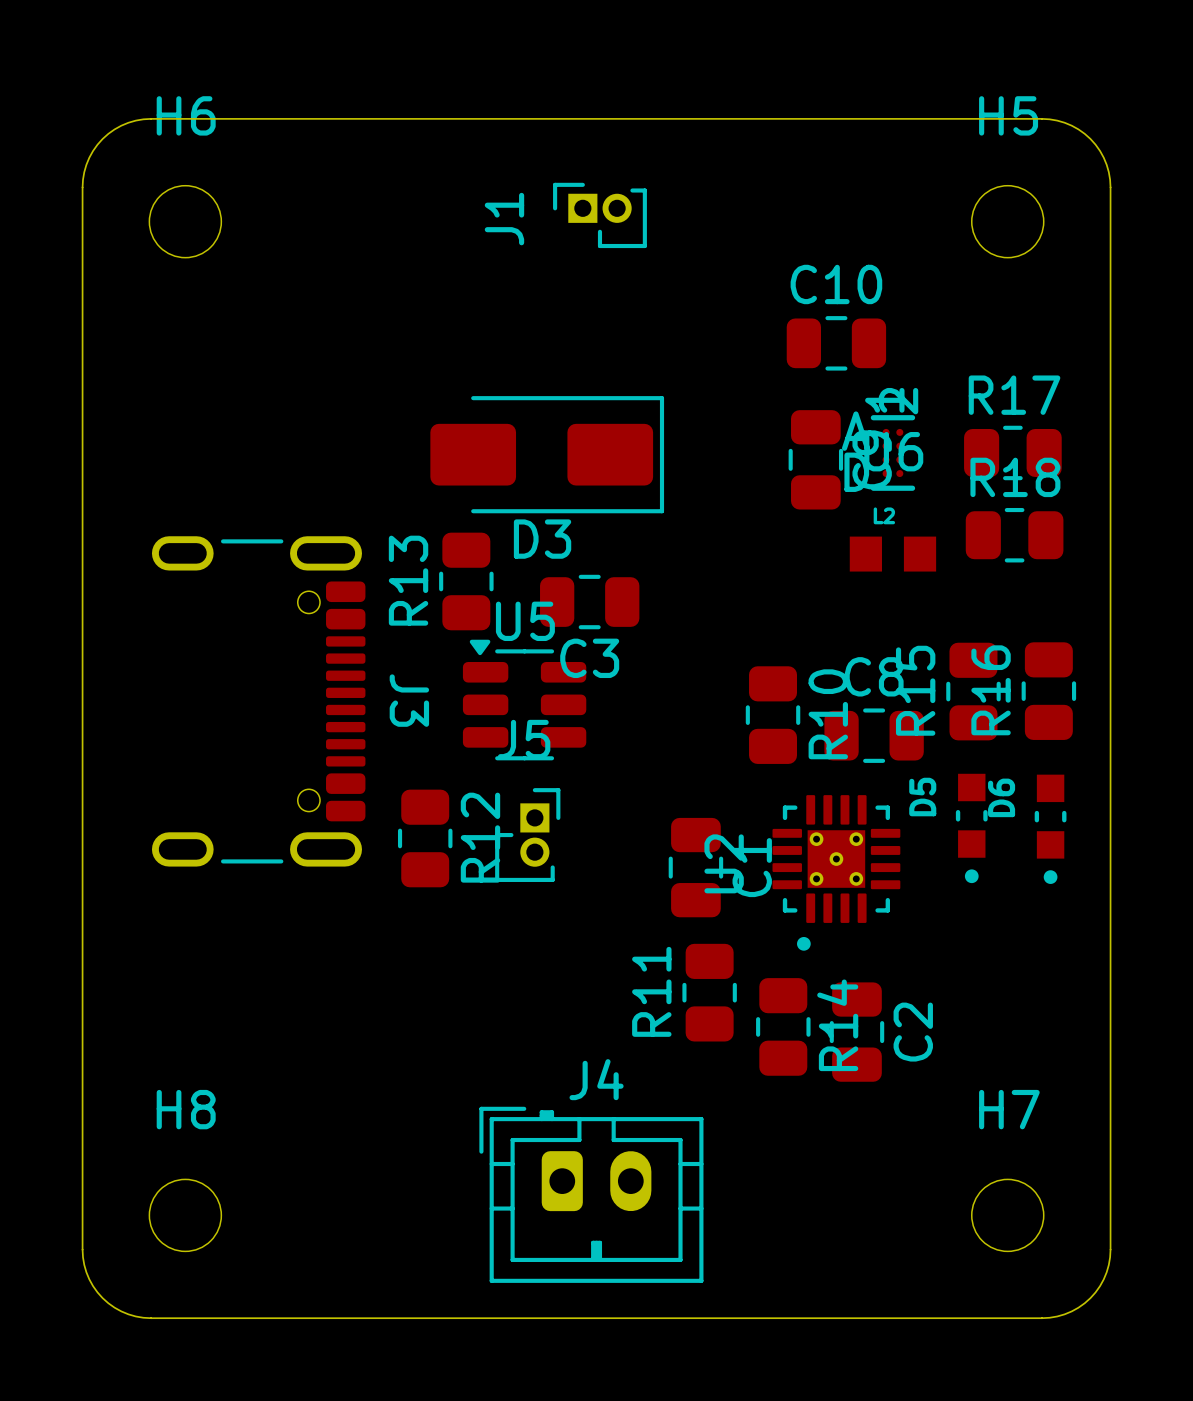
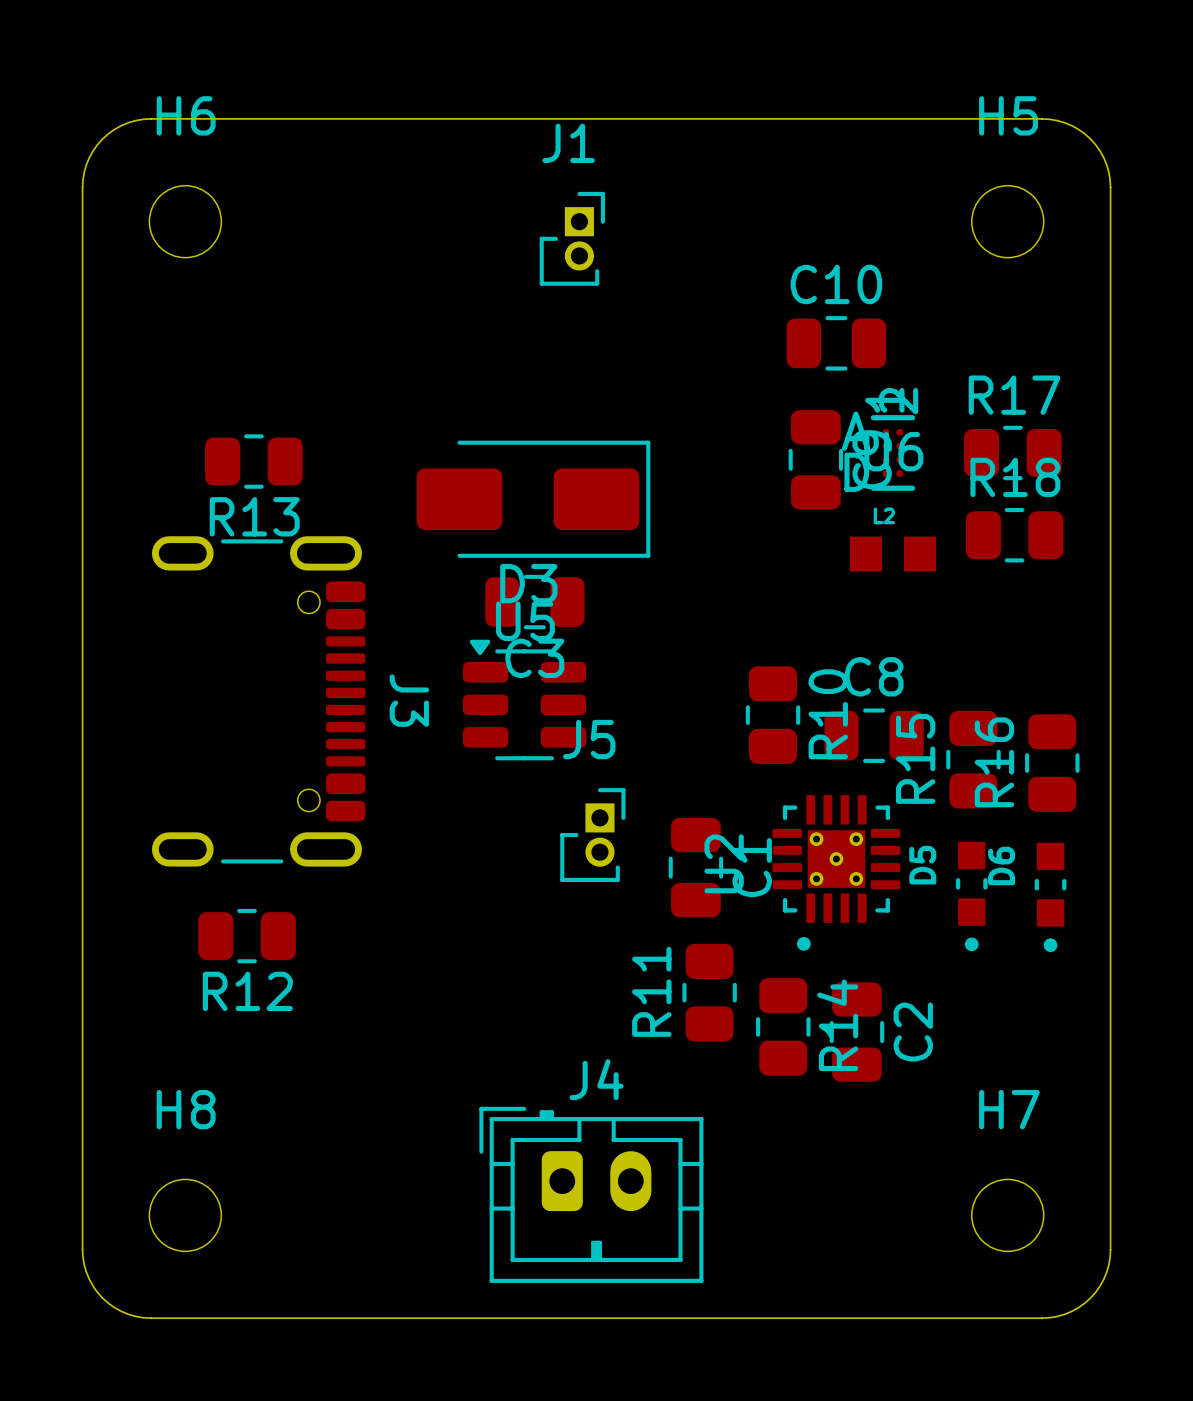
J1 rotation: 0° (599, 215) -> 90° clockwise (572, 238)
D3 position: (547, 454) -> (533, 499)
R13 name position: R13 (408, 580) -> R13 (254, 516)
R13 rotation: 0° (466, 581) -> 90° clockwise (253, 461)
R13 position: (466, 581) -> (253, 461)
C3 position: (589, 602) -> (534, 602)
R15 position: (973, 691) -> (973, 759)
R16 position: (1048, 691) -> (1052, 763)
D5 position: (971, 828) -> (971, 896)
D6 position: (1050, 829) -> (1050, 897)
J5 position: (527, 835) -> (592, 835)
R12 rotation: 0° (425, 838) -> 90° clockwise (247, 936)
R12 position: (425, 838) -> (247, 936)

